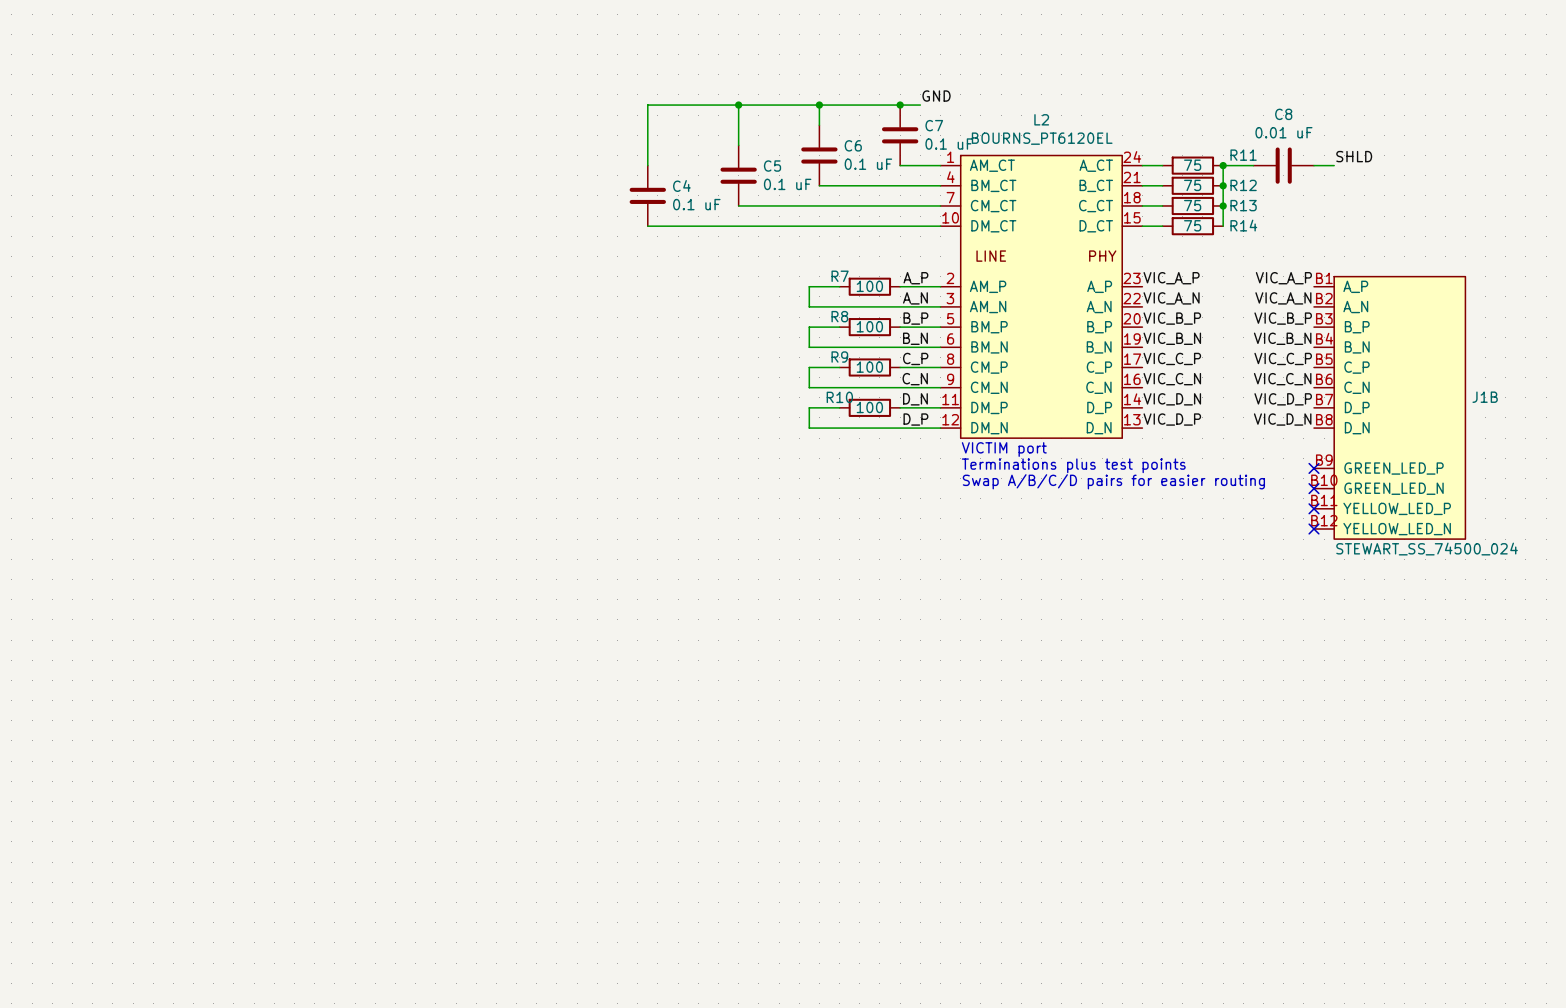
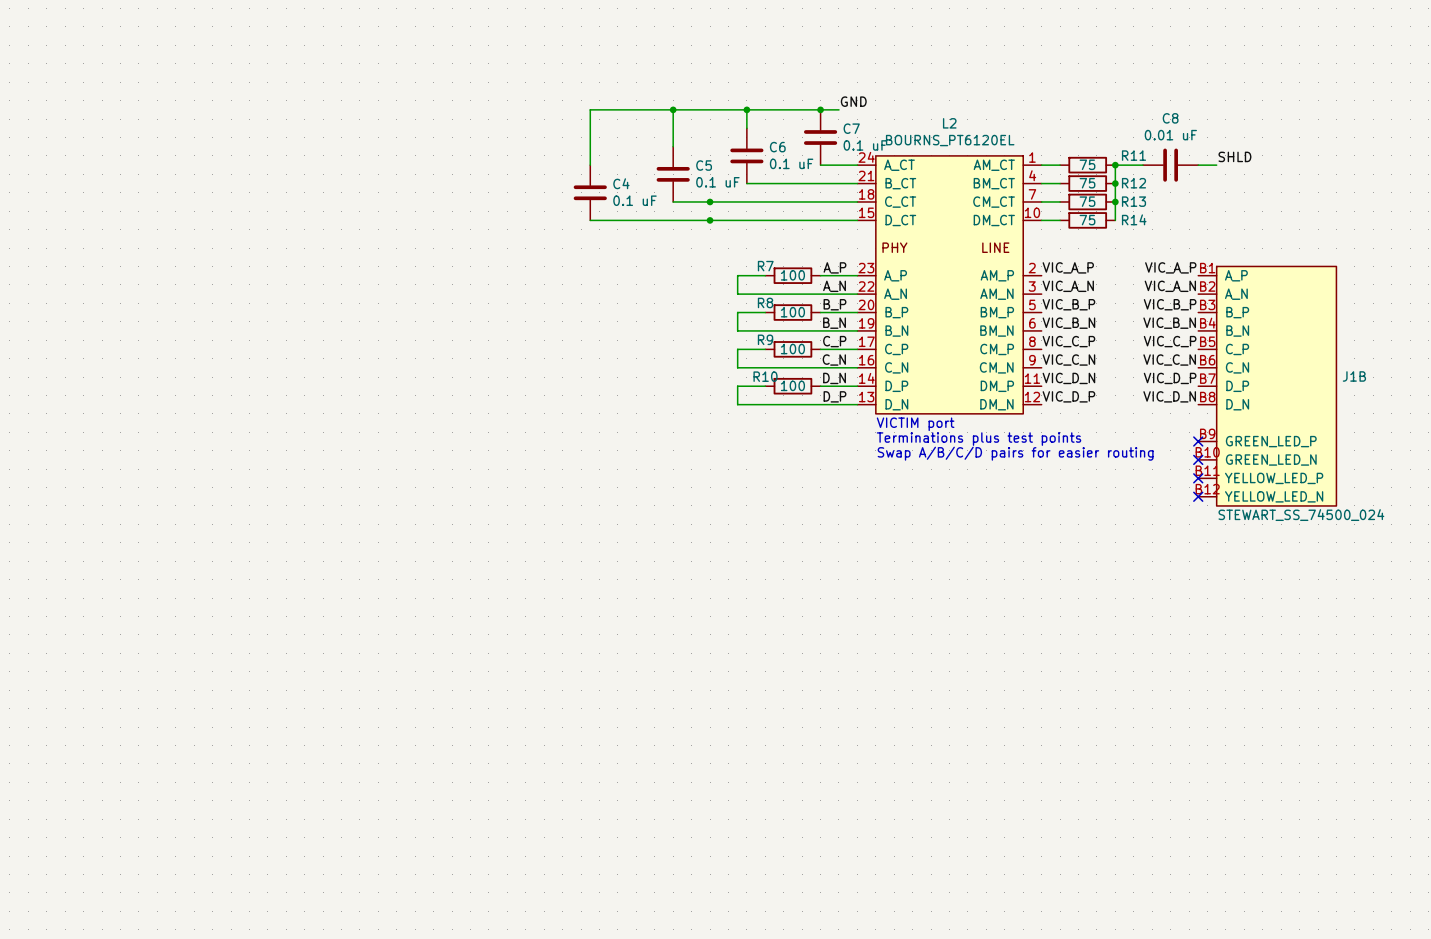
junction: none -> (710, 201)
junction: none -> (710, 220)
L2 flip: as is (1041, 296) -> left-right (949, 284)

